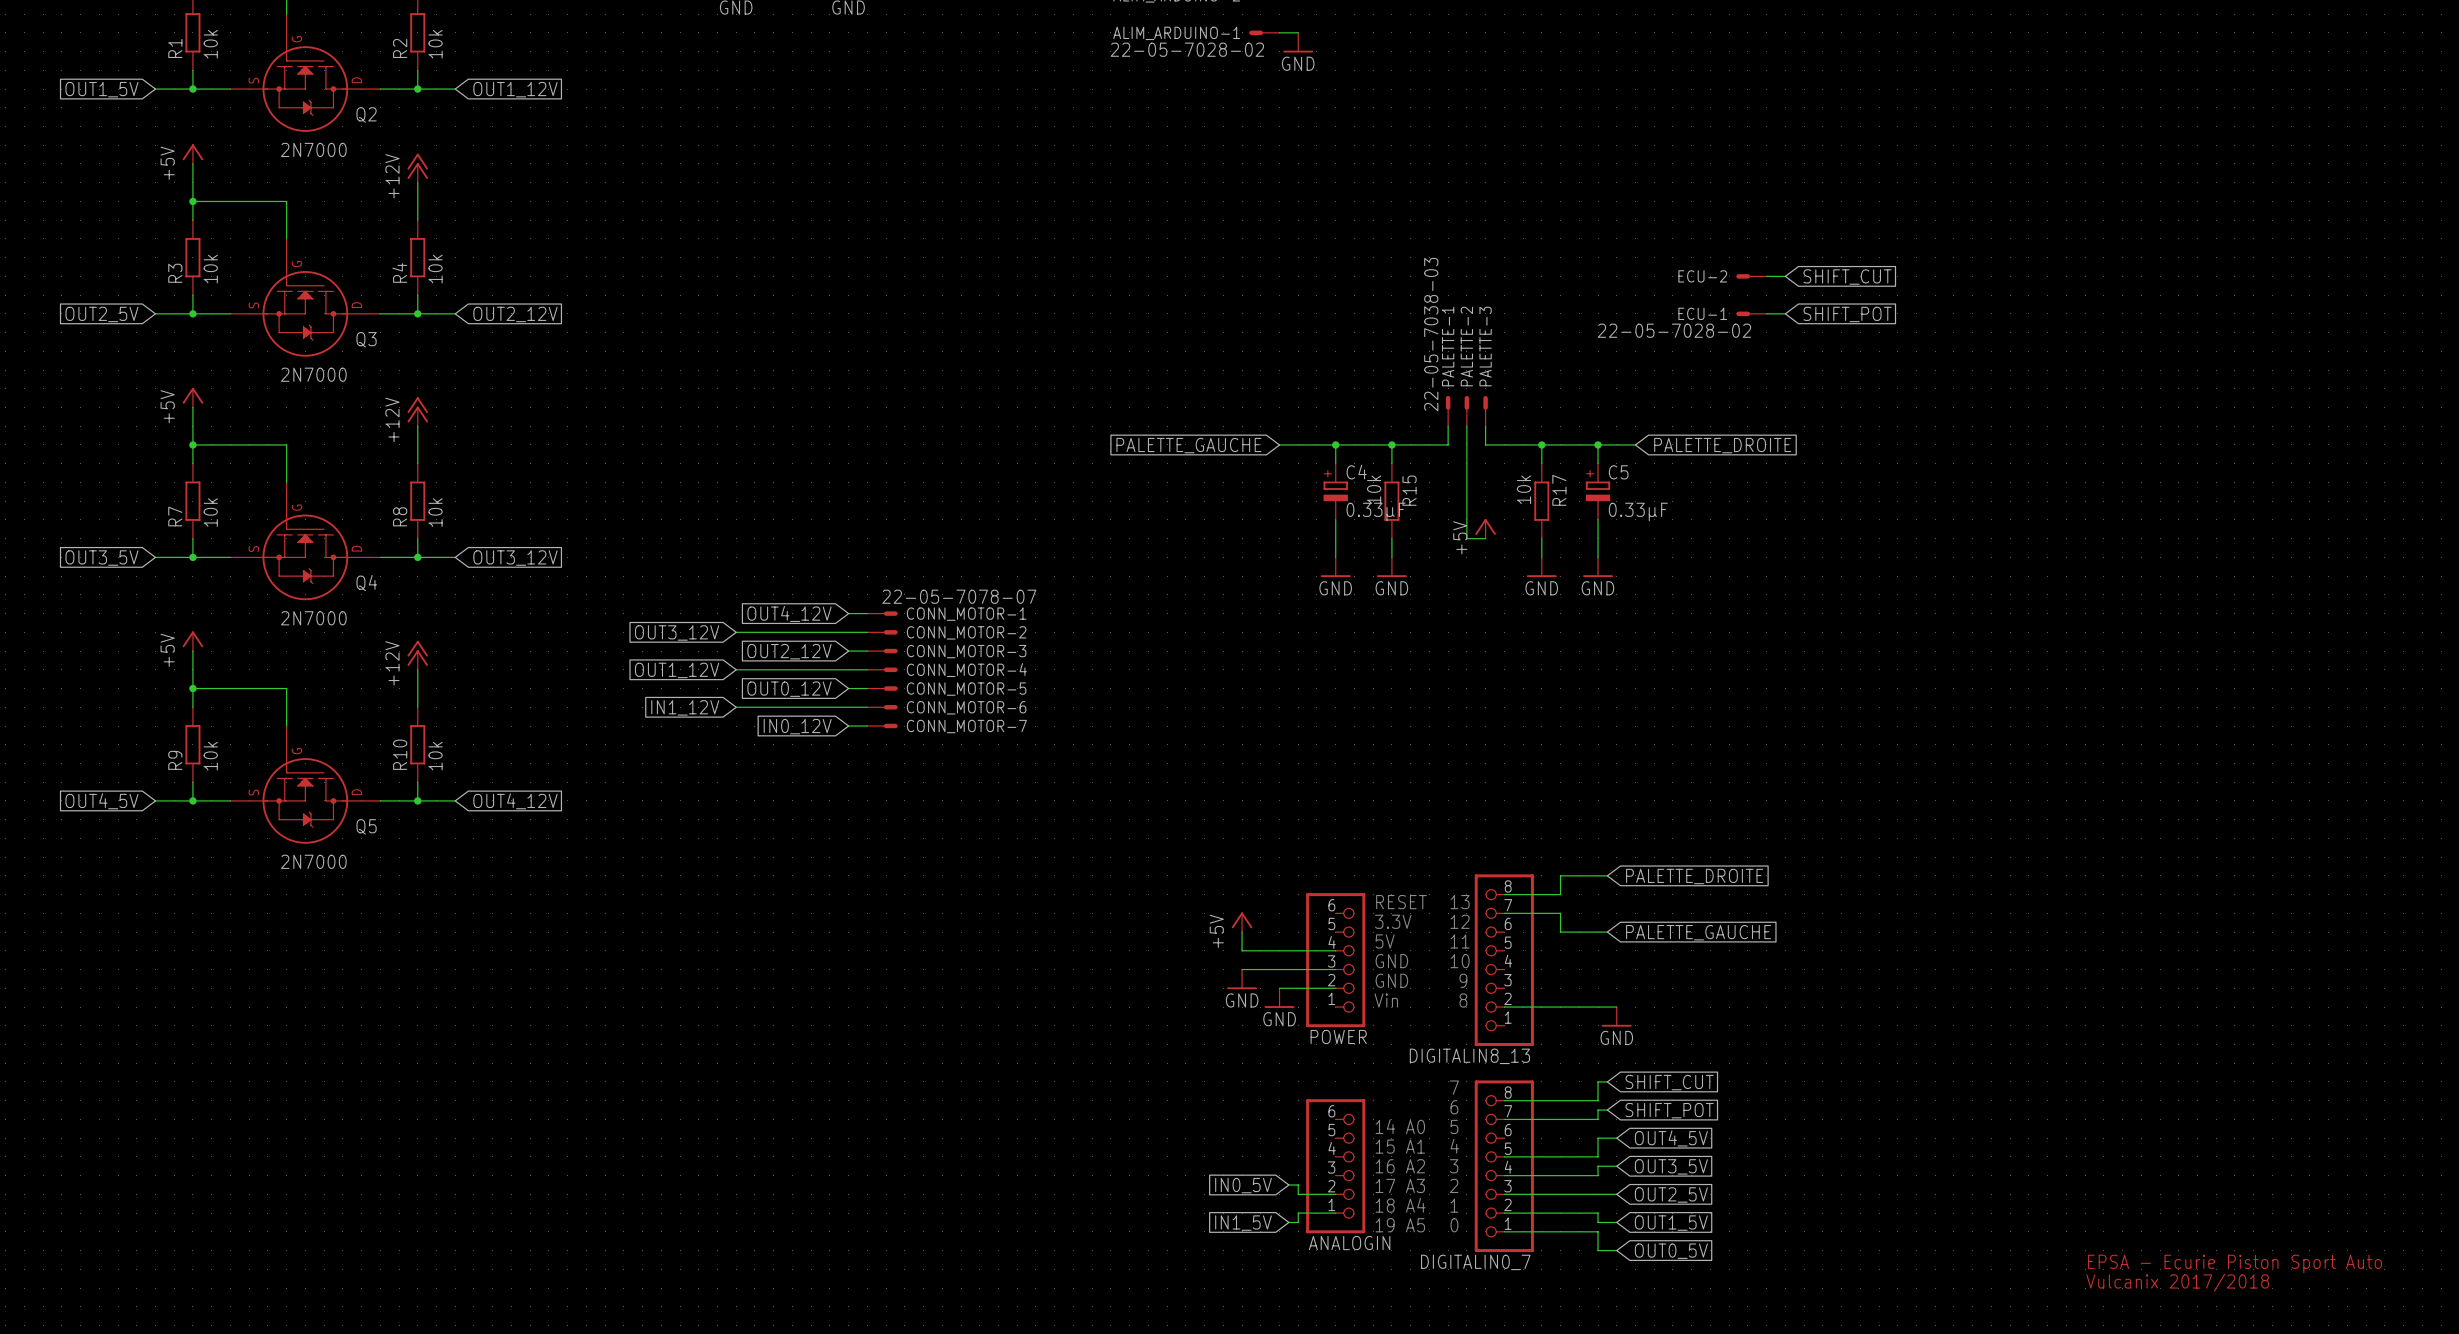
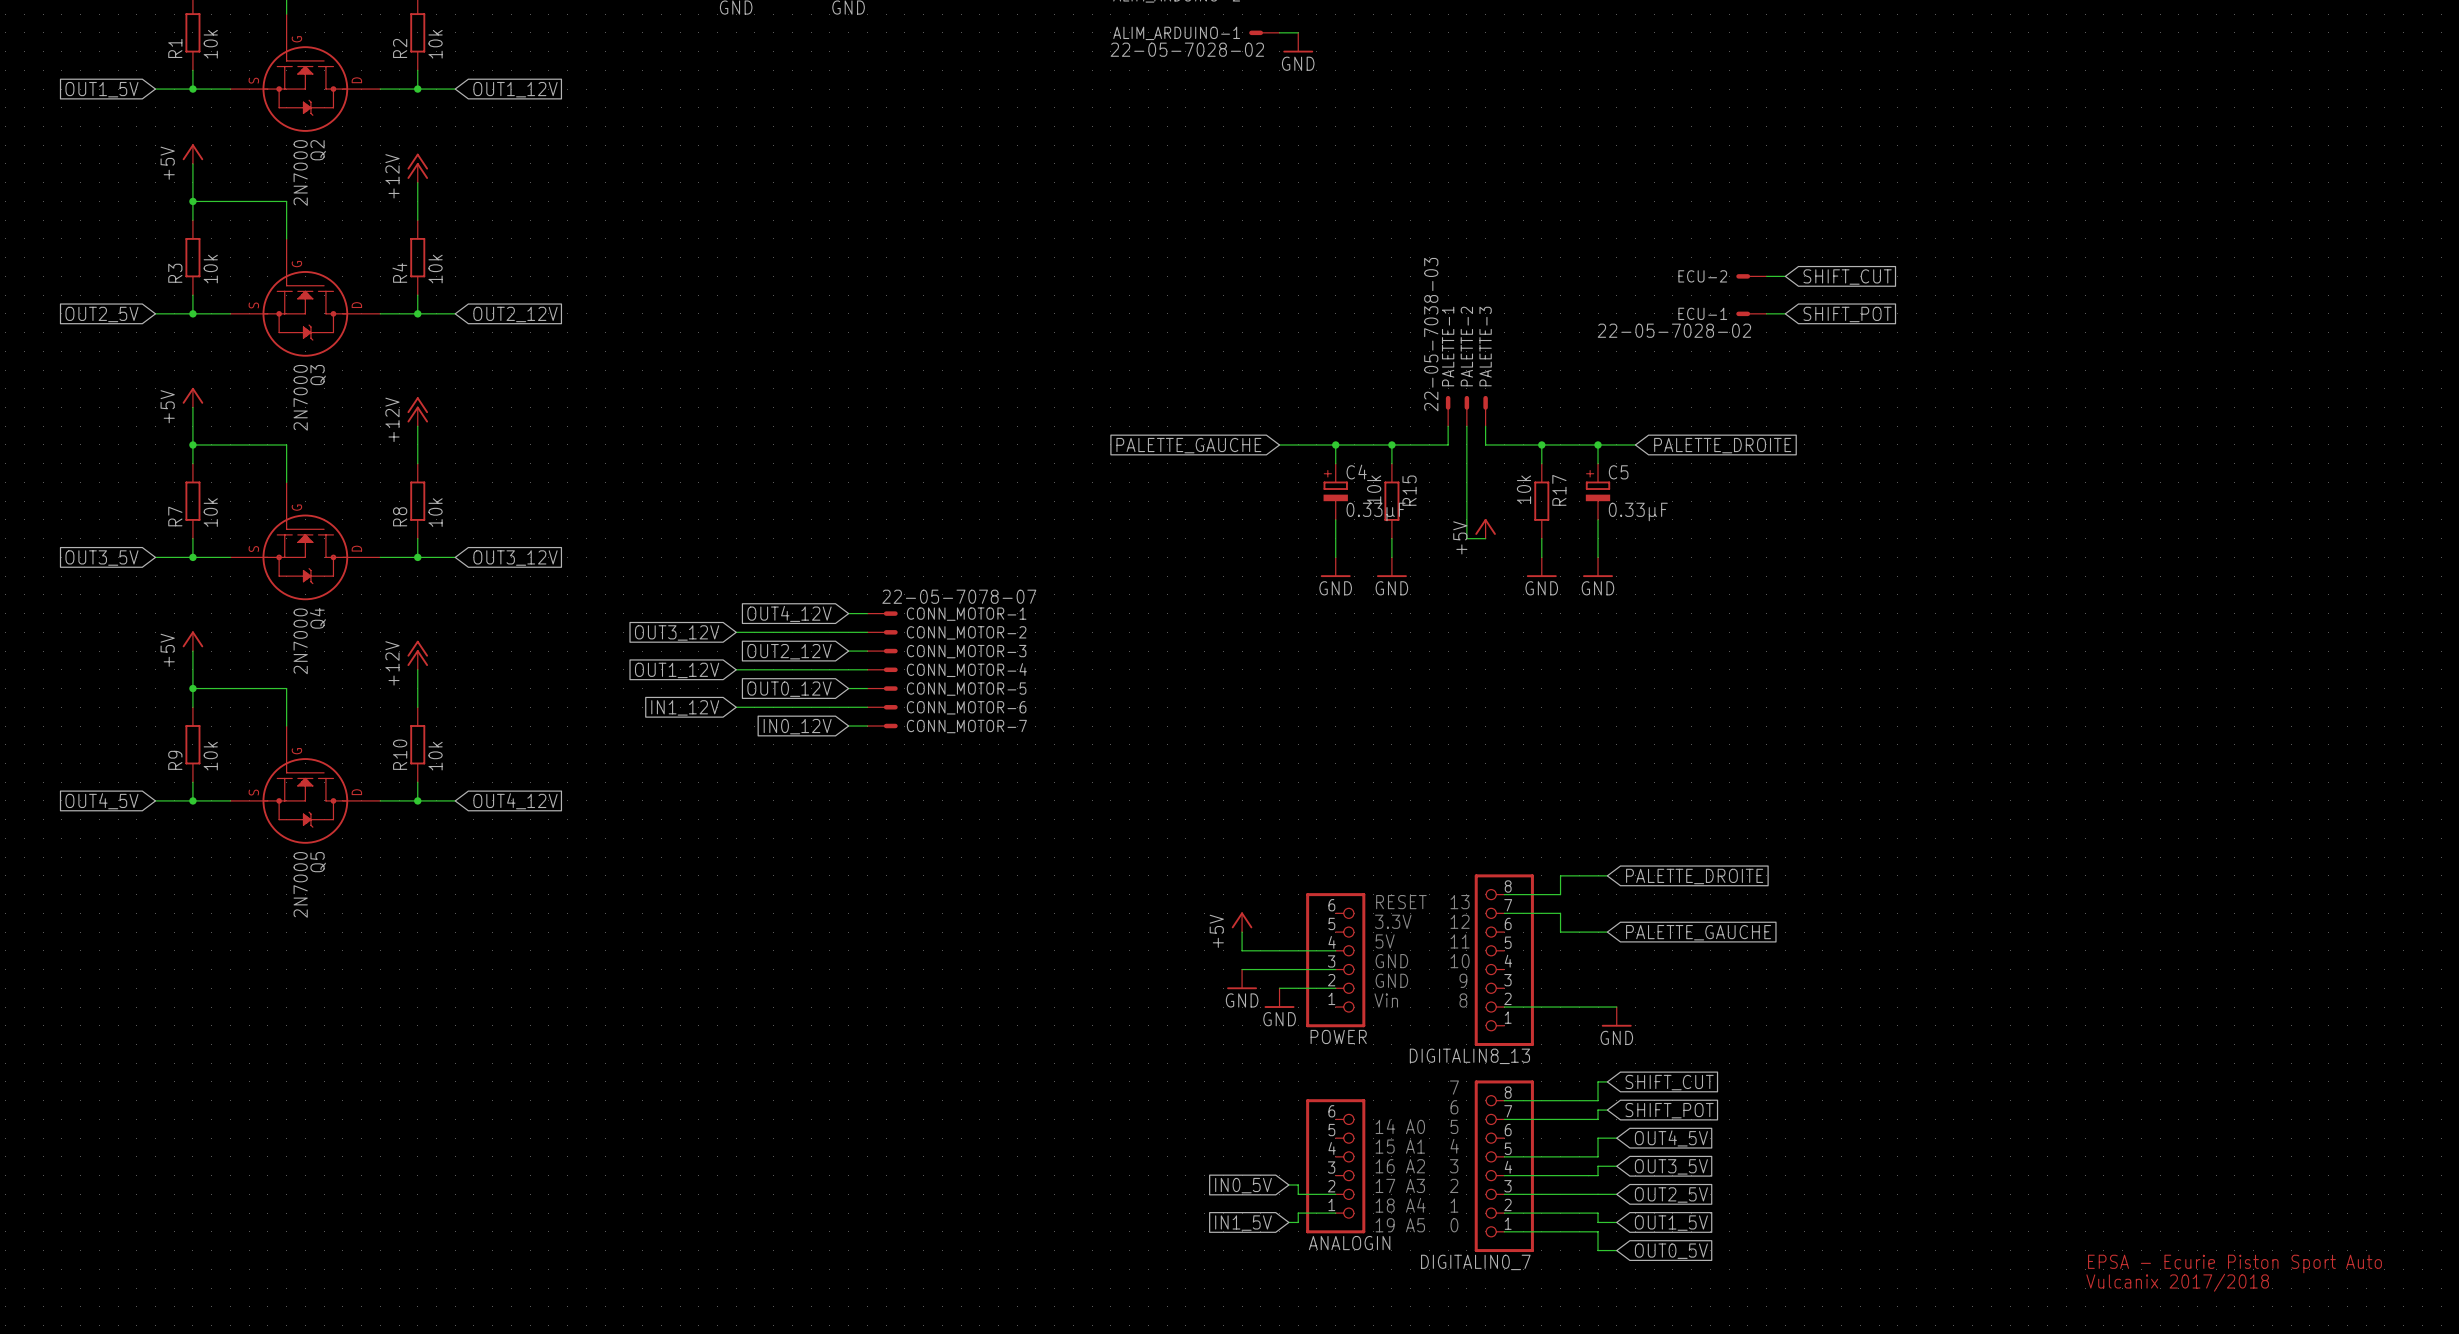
Q2 name rotation: 0° (366, 114) -> 90° counterclockwise (318, 150)
Q2 name position: Q2 (366, 114) -> Q2 (318, 150)
Q2 value rotation: 0° (313, 149) -> 90° counterclockwise (300, 173)
Q3 name rotation: 0° (366, 339) -> 90° counterclockwise (318, 375)
Q3 name position: Q3 (366, 339) -> Q3 (318, 375)
Q3 value rotation: 0° (313, 374) -> 90° counterclockwise (300, 397)
Q4 name rotation: 0° (366, 583) -> 90° counterclockwise (317, 618)
Q4 name position: Q4 (366, 583) -> Q4 (317, 618)
Q4 value rotation: 0° (313, 618) -> 90° counterclockwise (300, 641)
Q5 name rotation: 0° (366, 826) -> 90° counterclockwise (318, 862)
Q5 name position: Q5 (366, 826) -> Q5 (318, 862)
Q5 value rotation: 0° (313, 861) -> 90° counterclockwise (300, 884)

